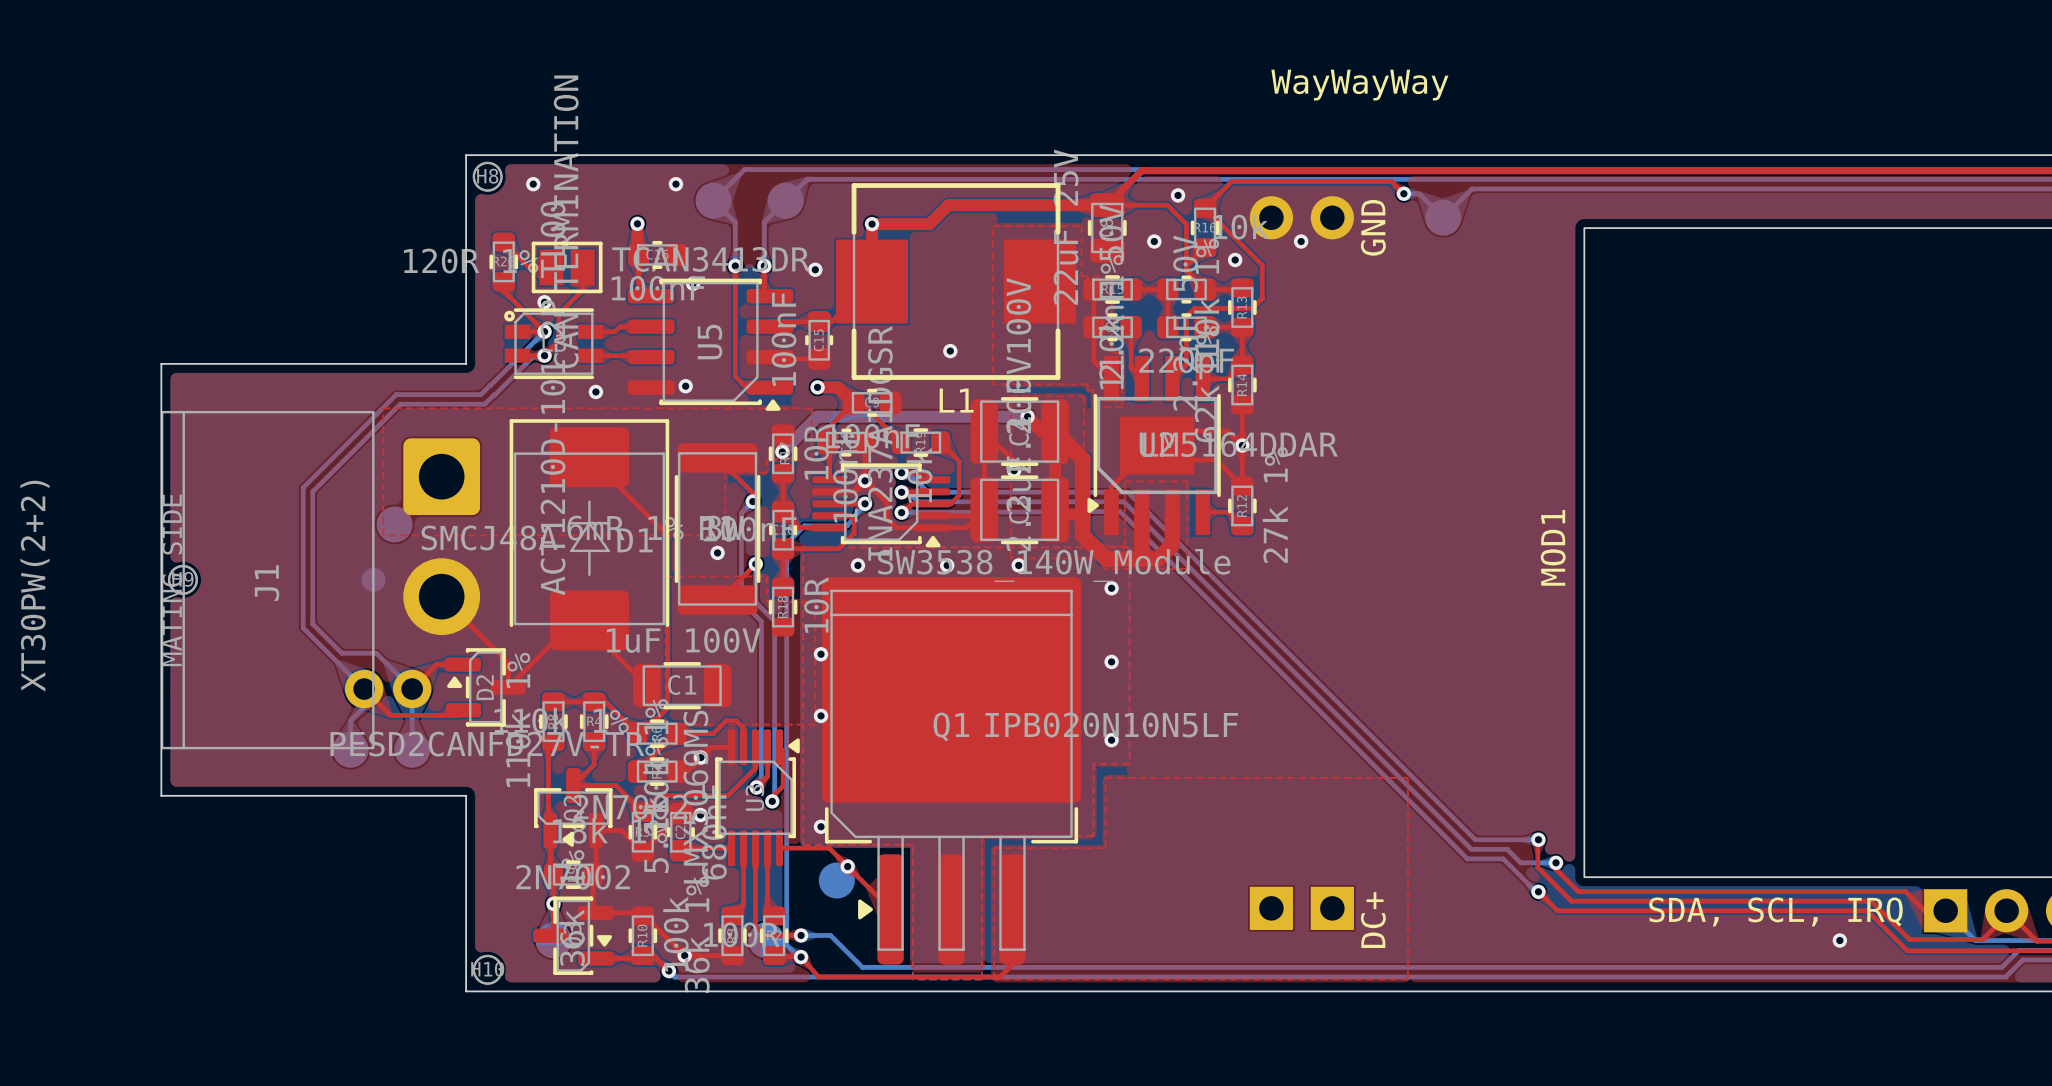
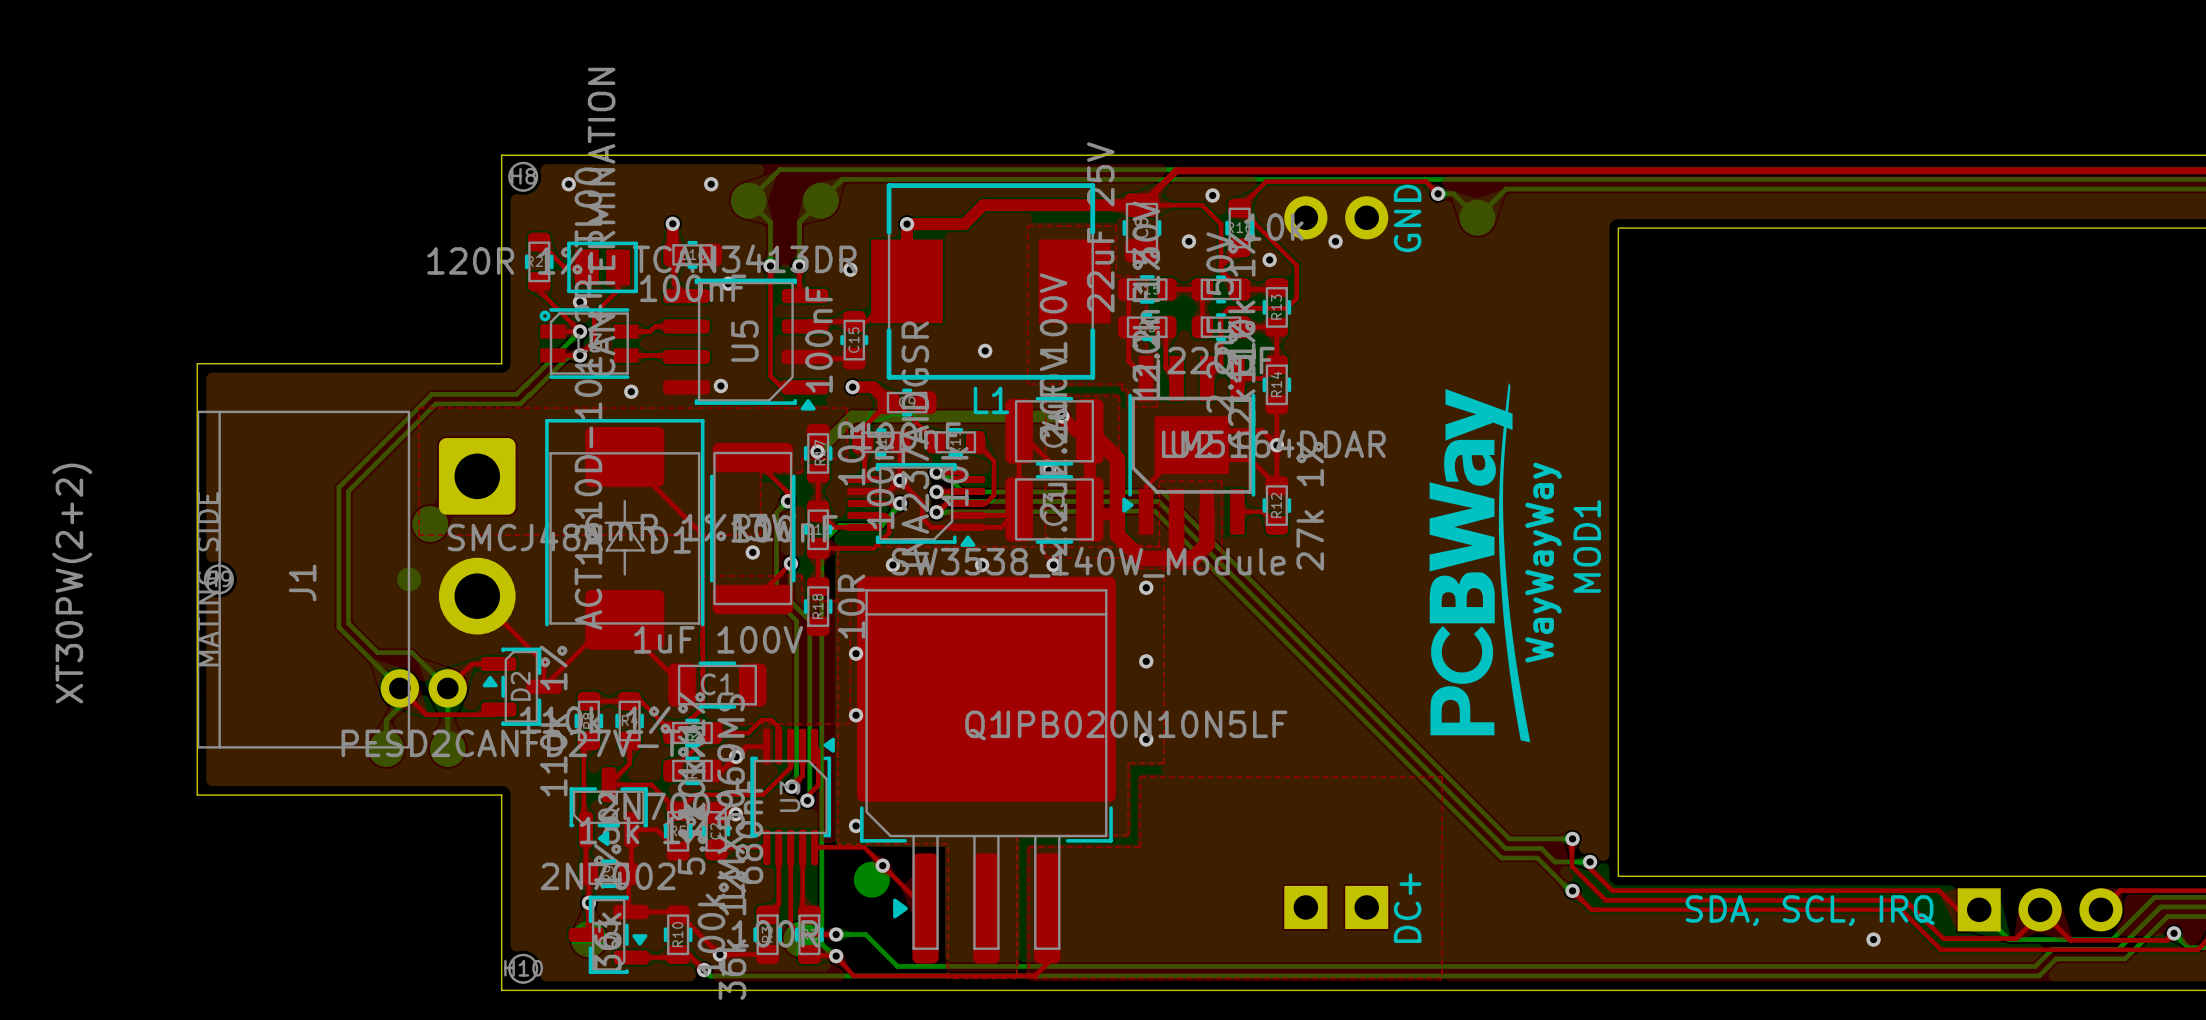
text rotation: 0° (1359, 85) -> 90° counterclockwise (1543, 562)
text position: WayWayWay (1359, 85) -> WayWayWay (1543, 562)
drawing: none -> [1429, 382, 1531, 743]

